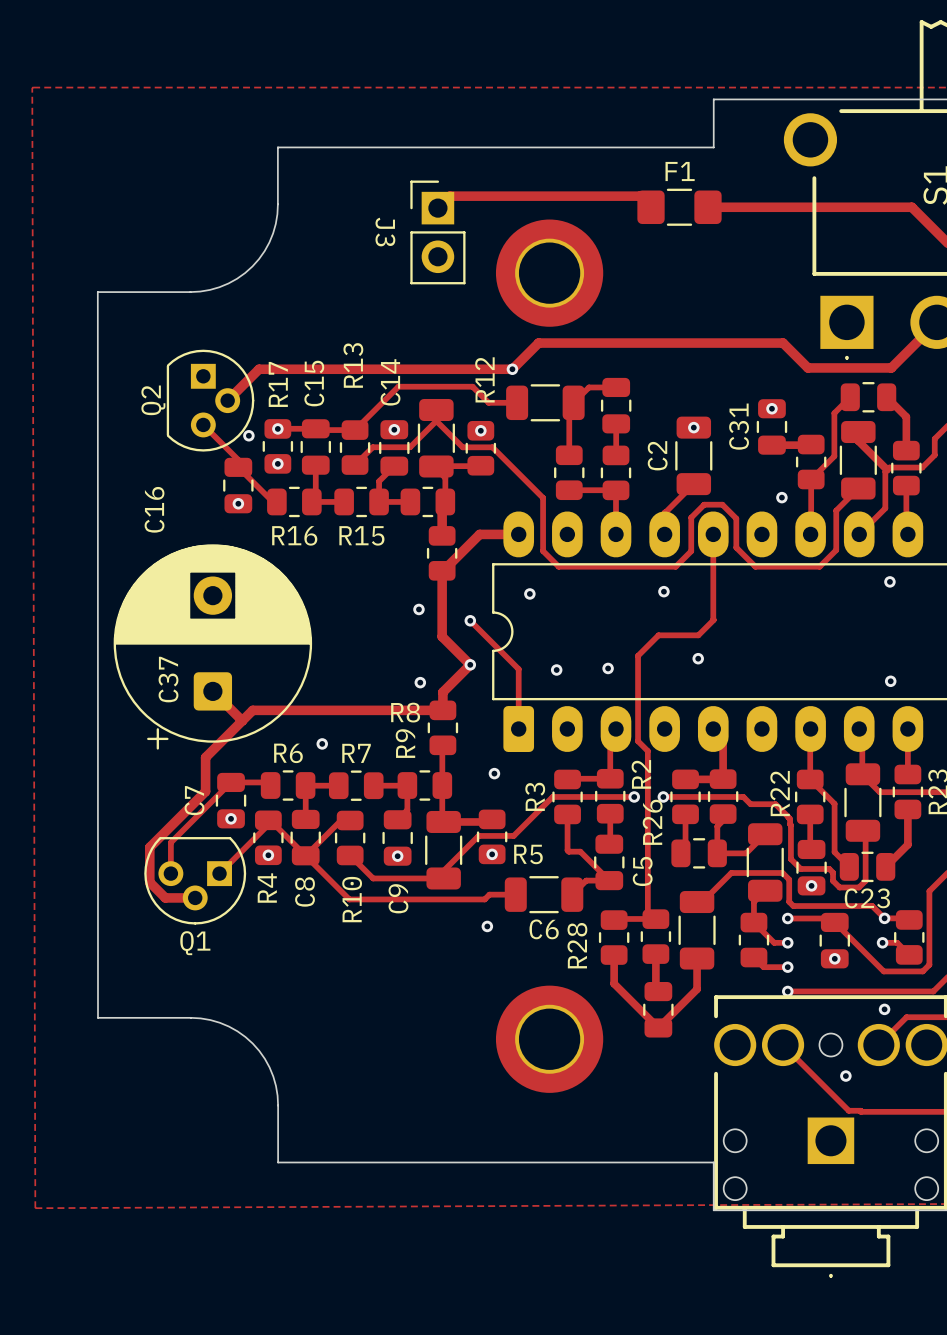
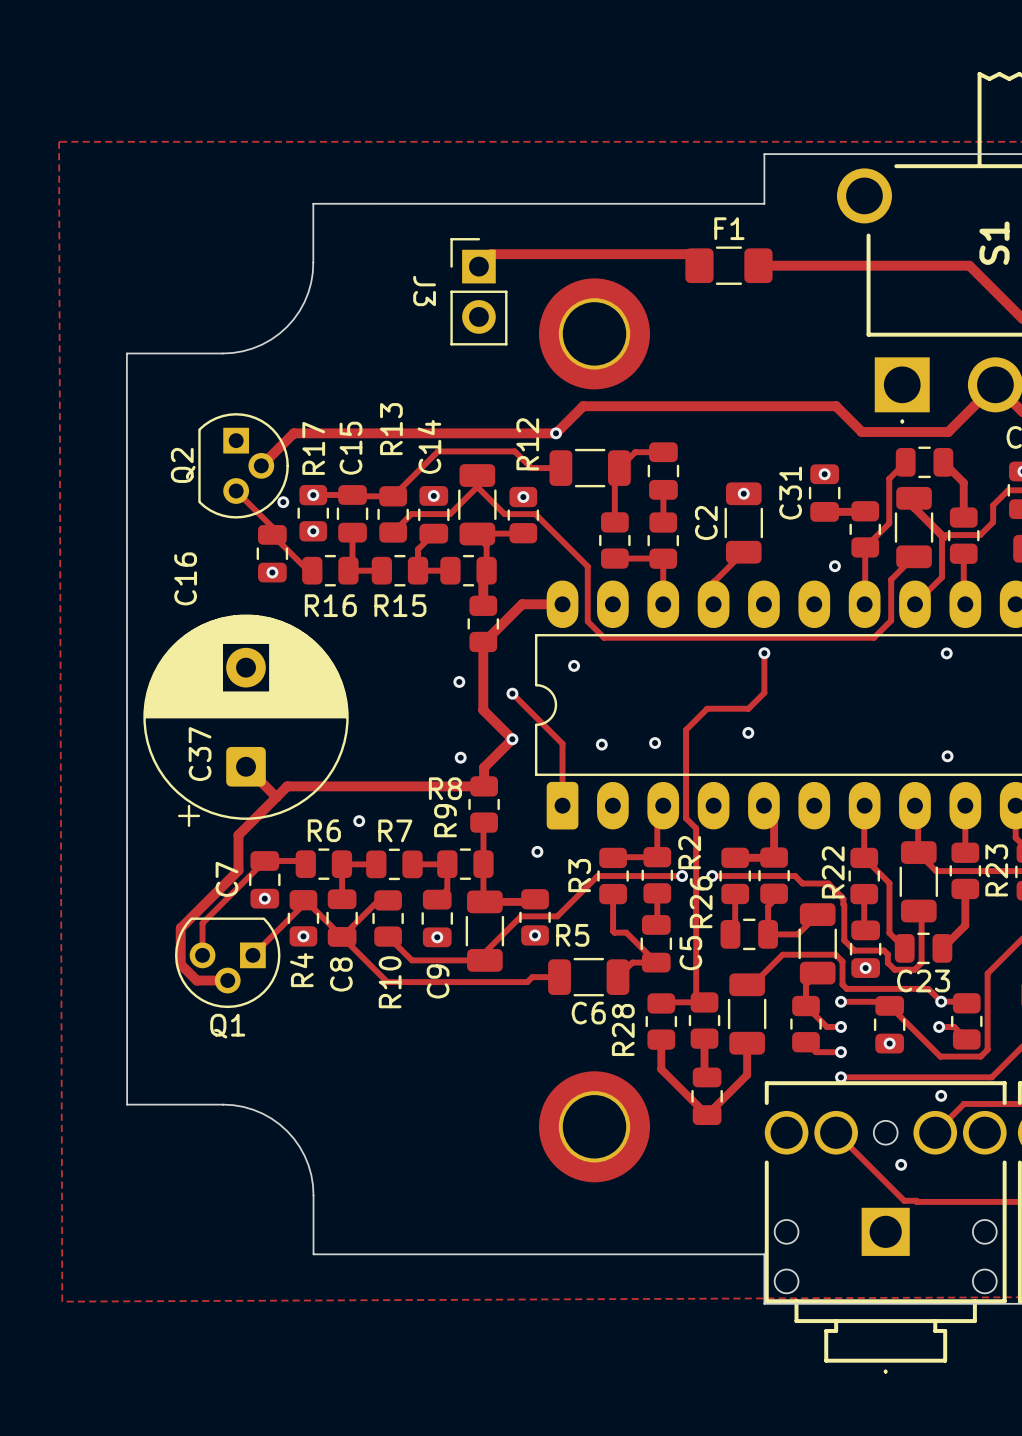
track: (713, 534) (713, 620) -> (764, 653) (764, 692)
track: (675, 566) (691, 551) (691, 517) (704, 504) (722, 504) (736, 518) (736, 547) (755, 566) -> (725, 637) (807, 637)
via position: (663, 591) -> (764, 653)
via: (487, 926) -> none

